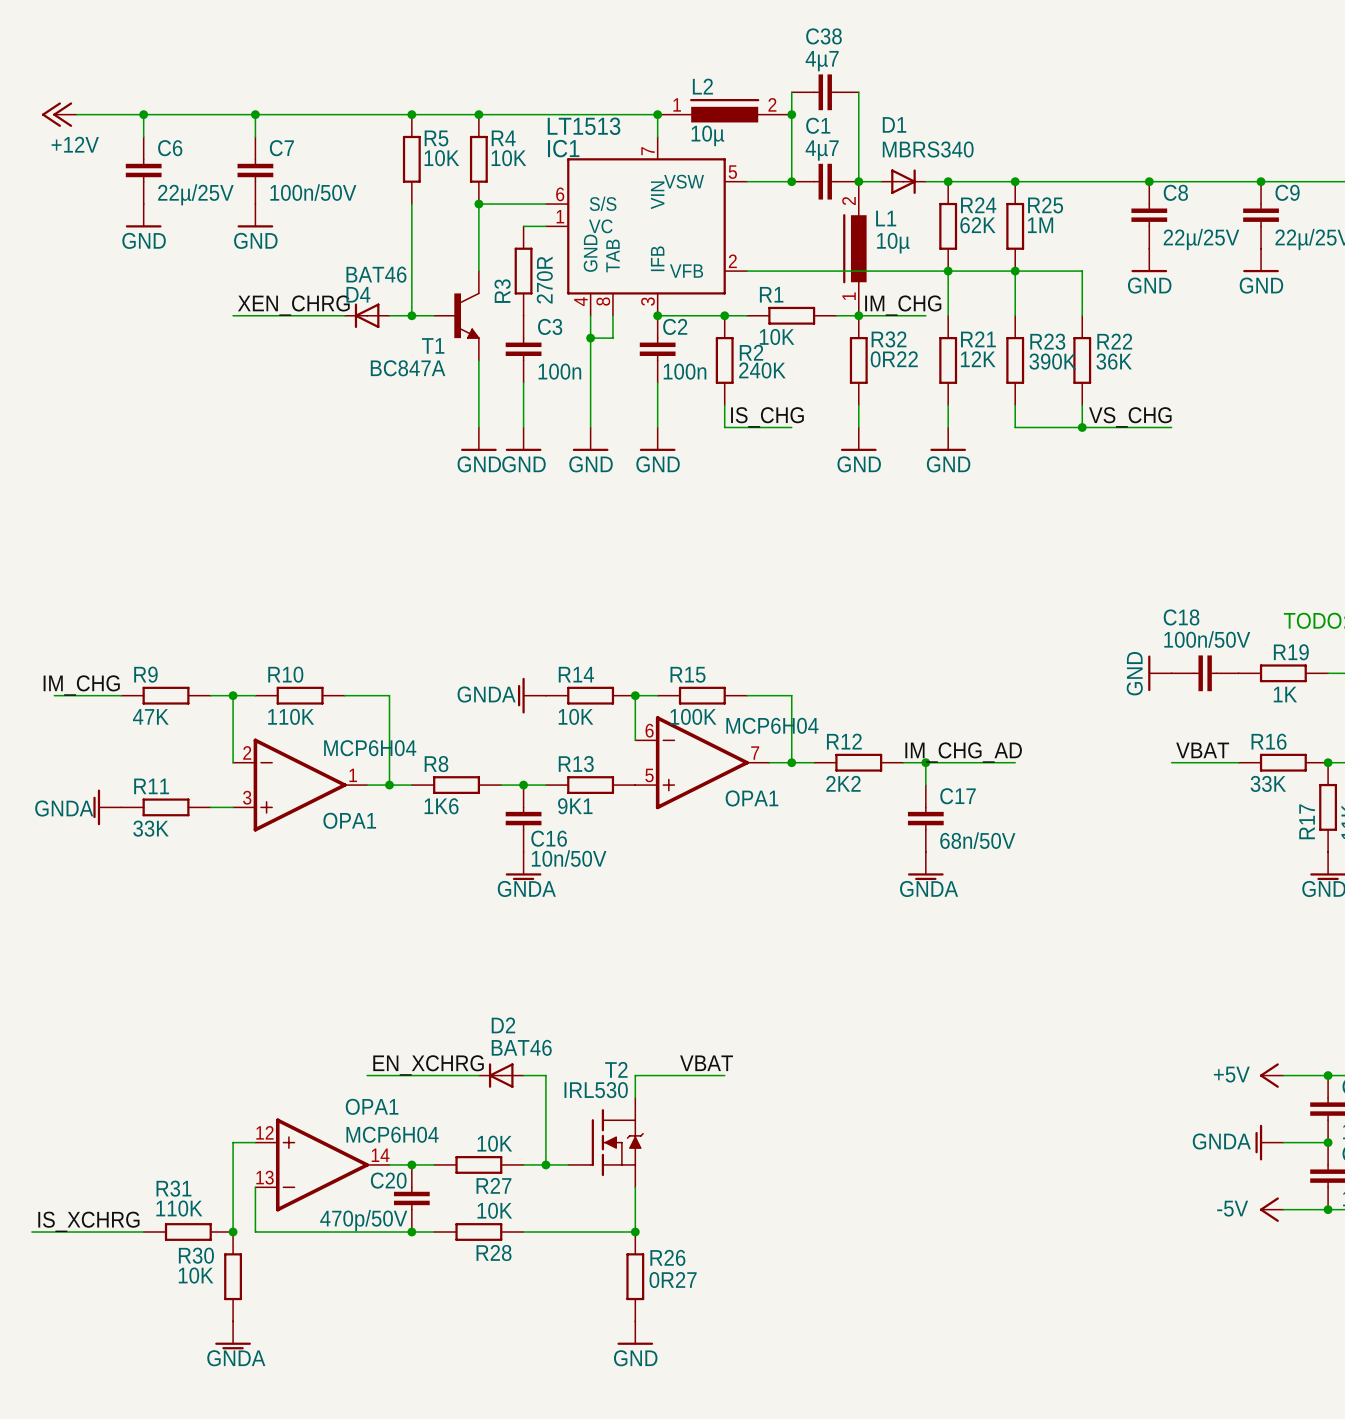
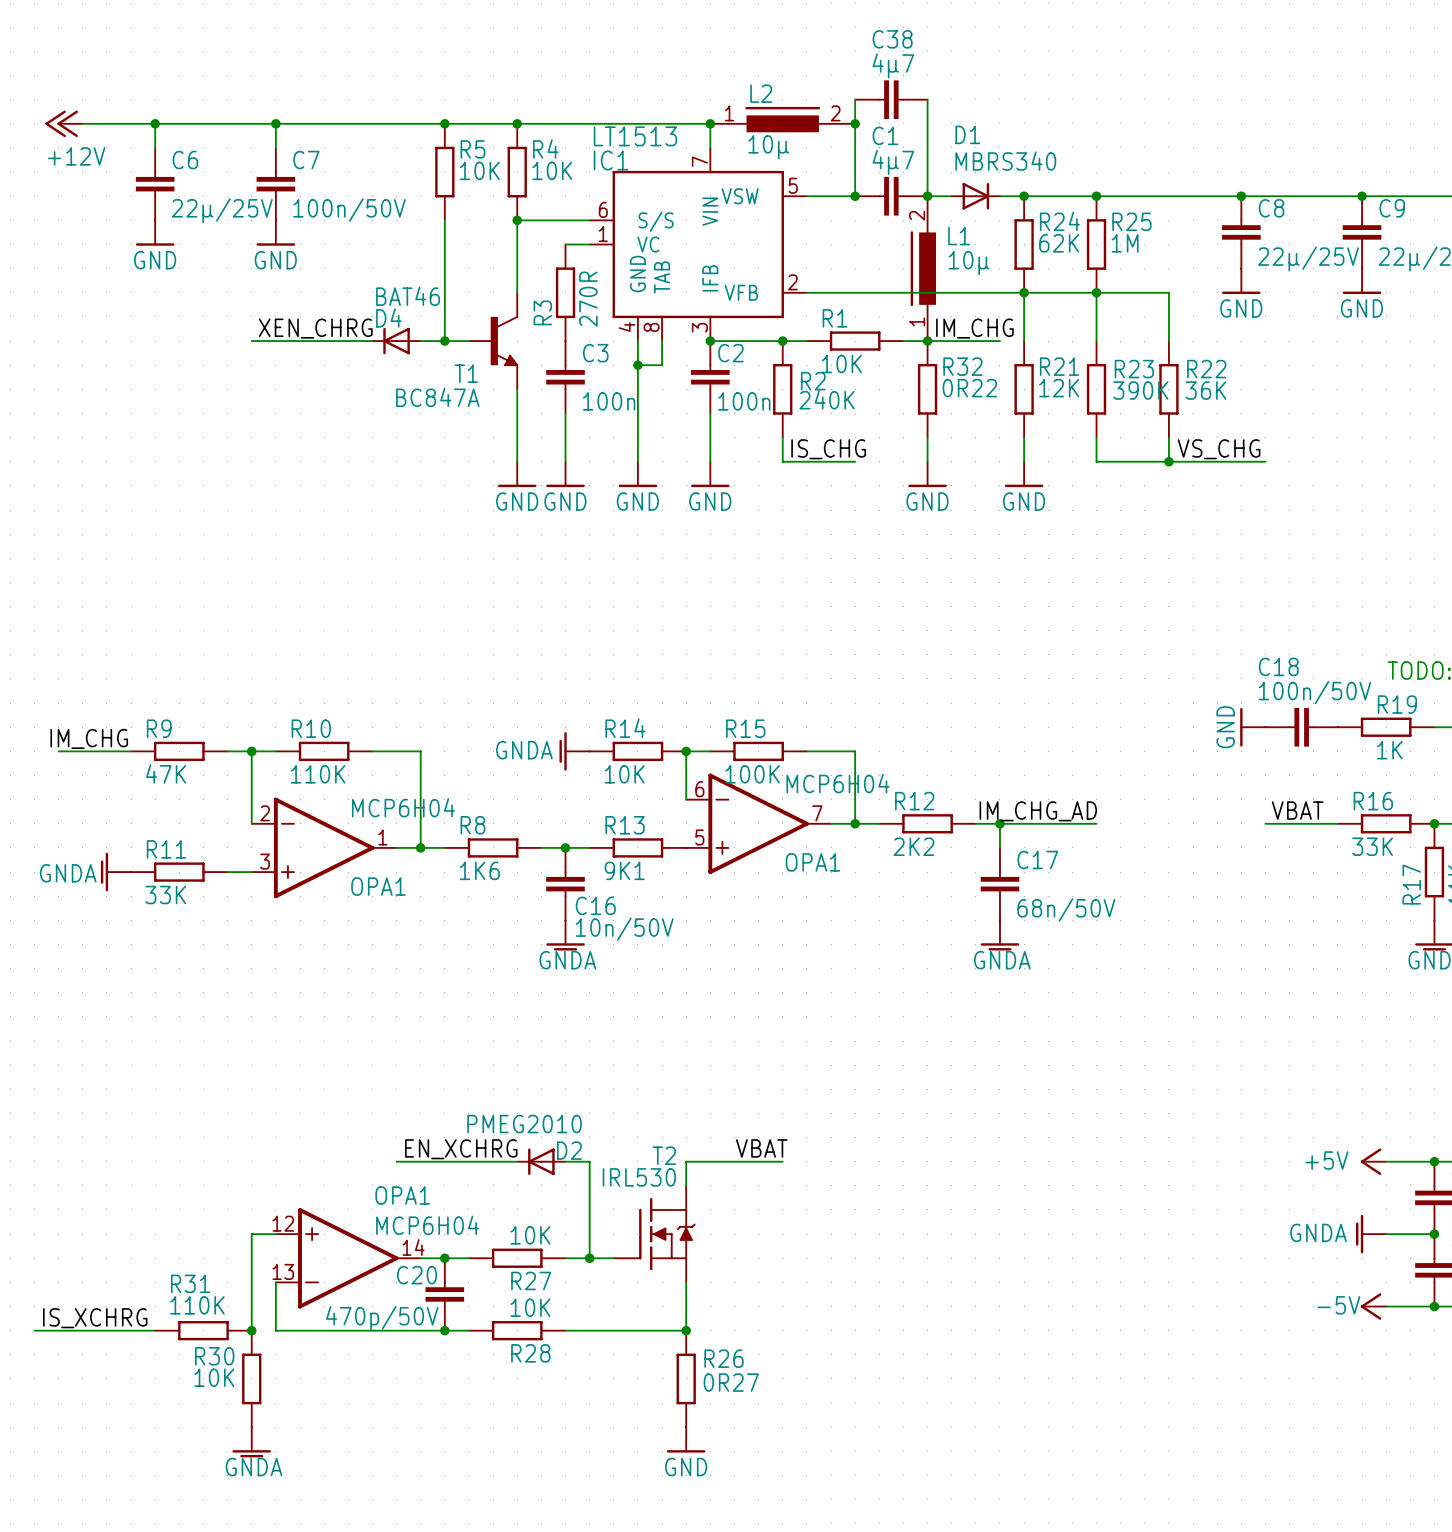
D2 name position: D2 (503, 1025) -> D2 (569, 1150)
D2 value: BAT46 (521, 1047) -> PMEG2010 (524, 1124)

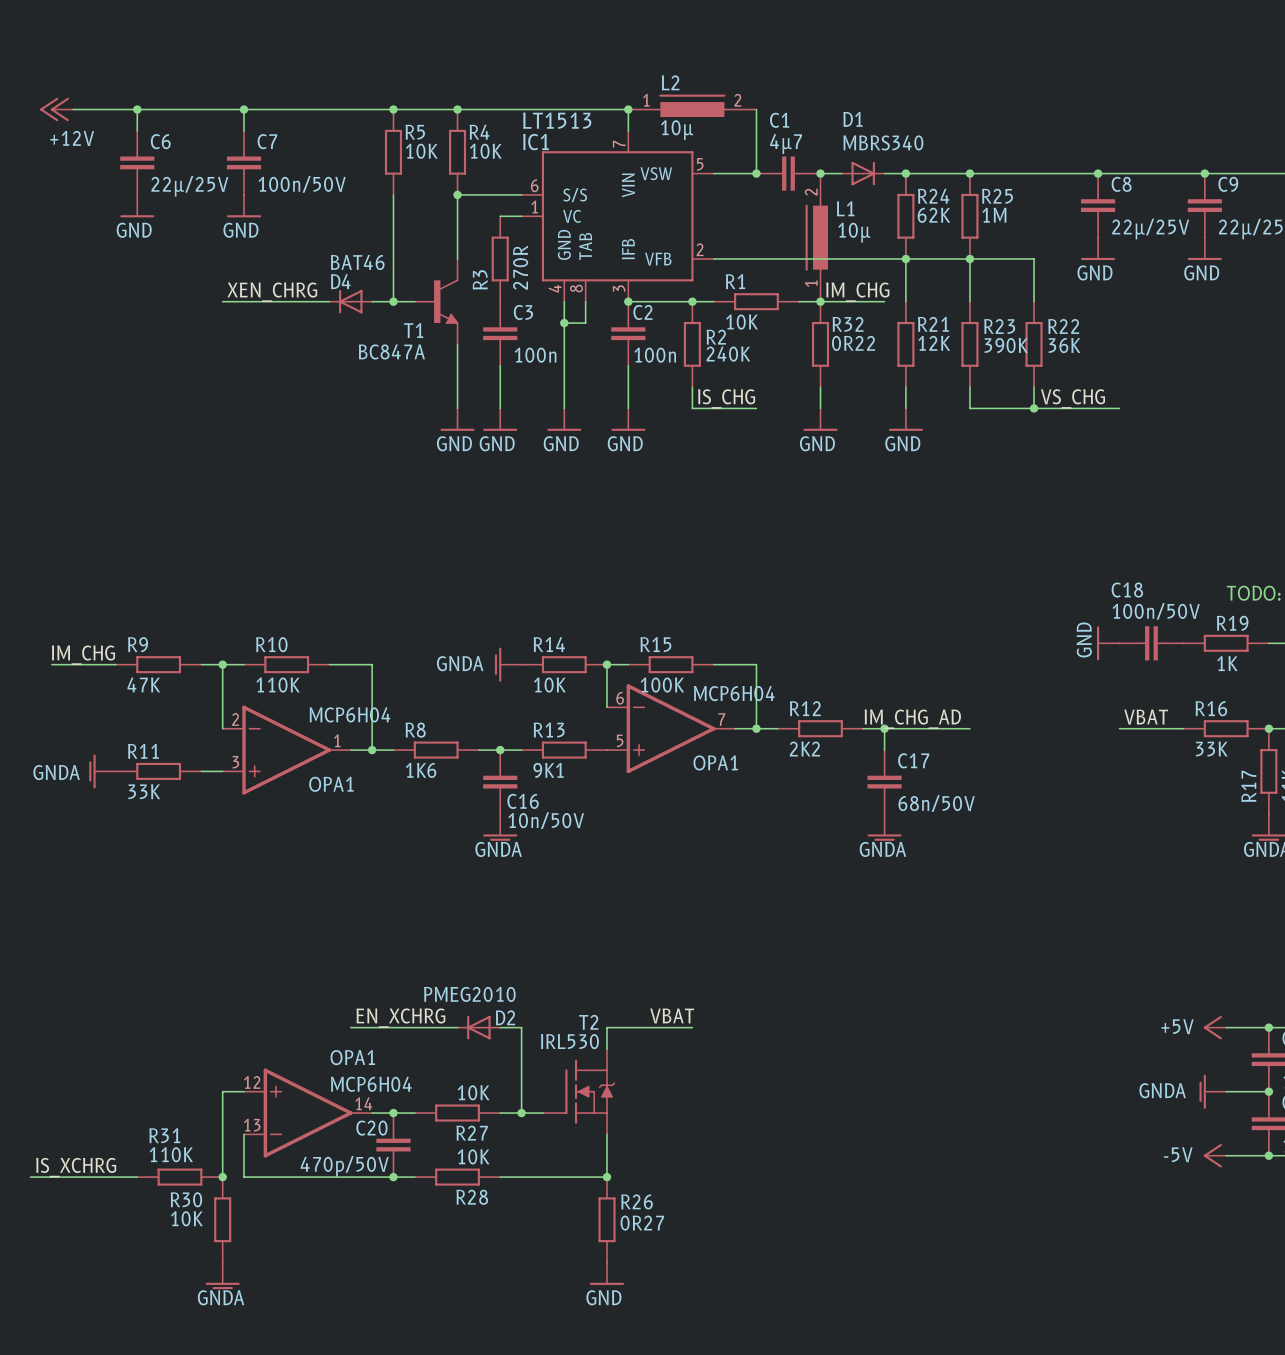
wire: (855, 99) (855, 123) -> none
C38: 4µ7 (891, 99) -> none
wire: (927, 99) (927, 196) -> none
junction: (855, 123) -> none

